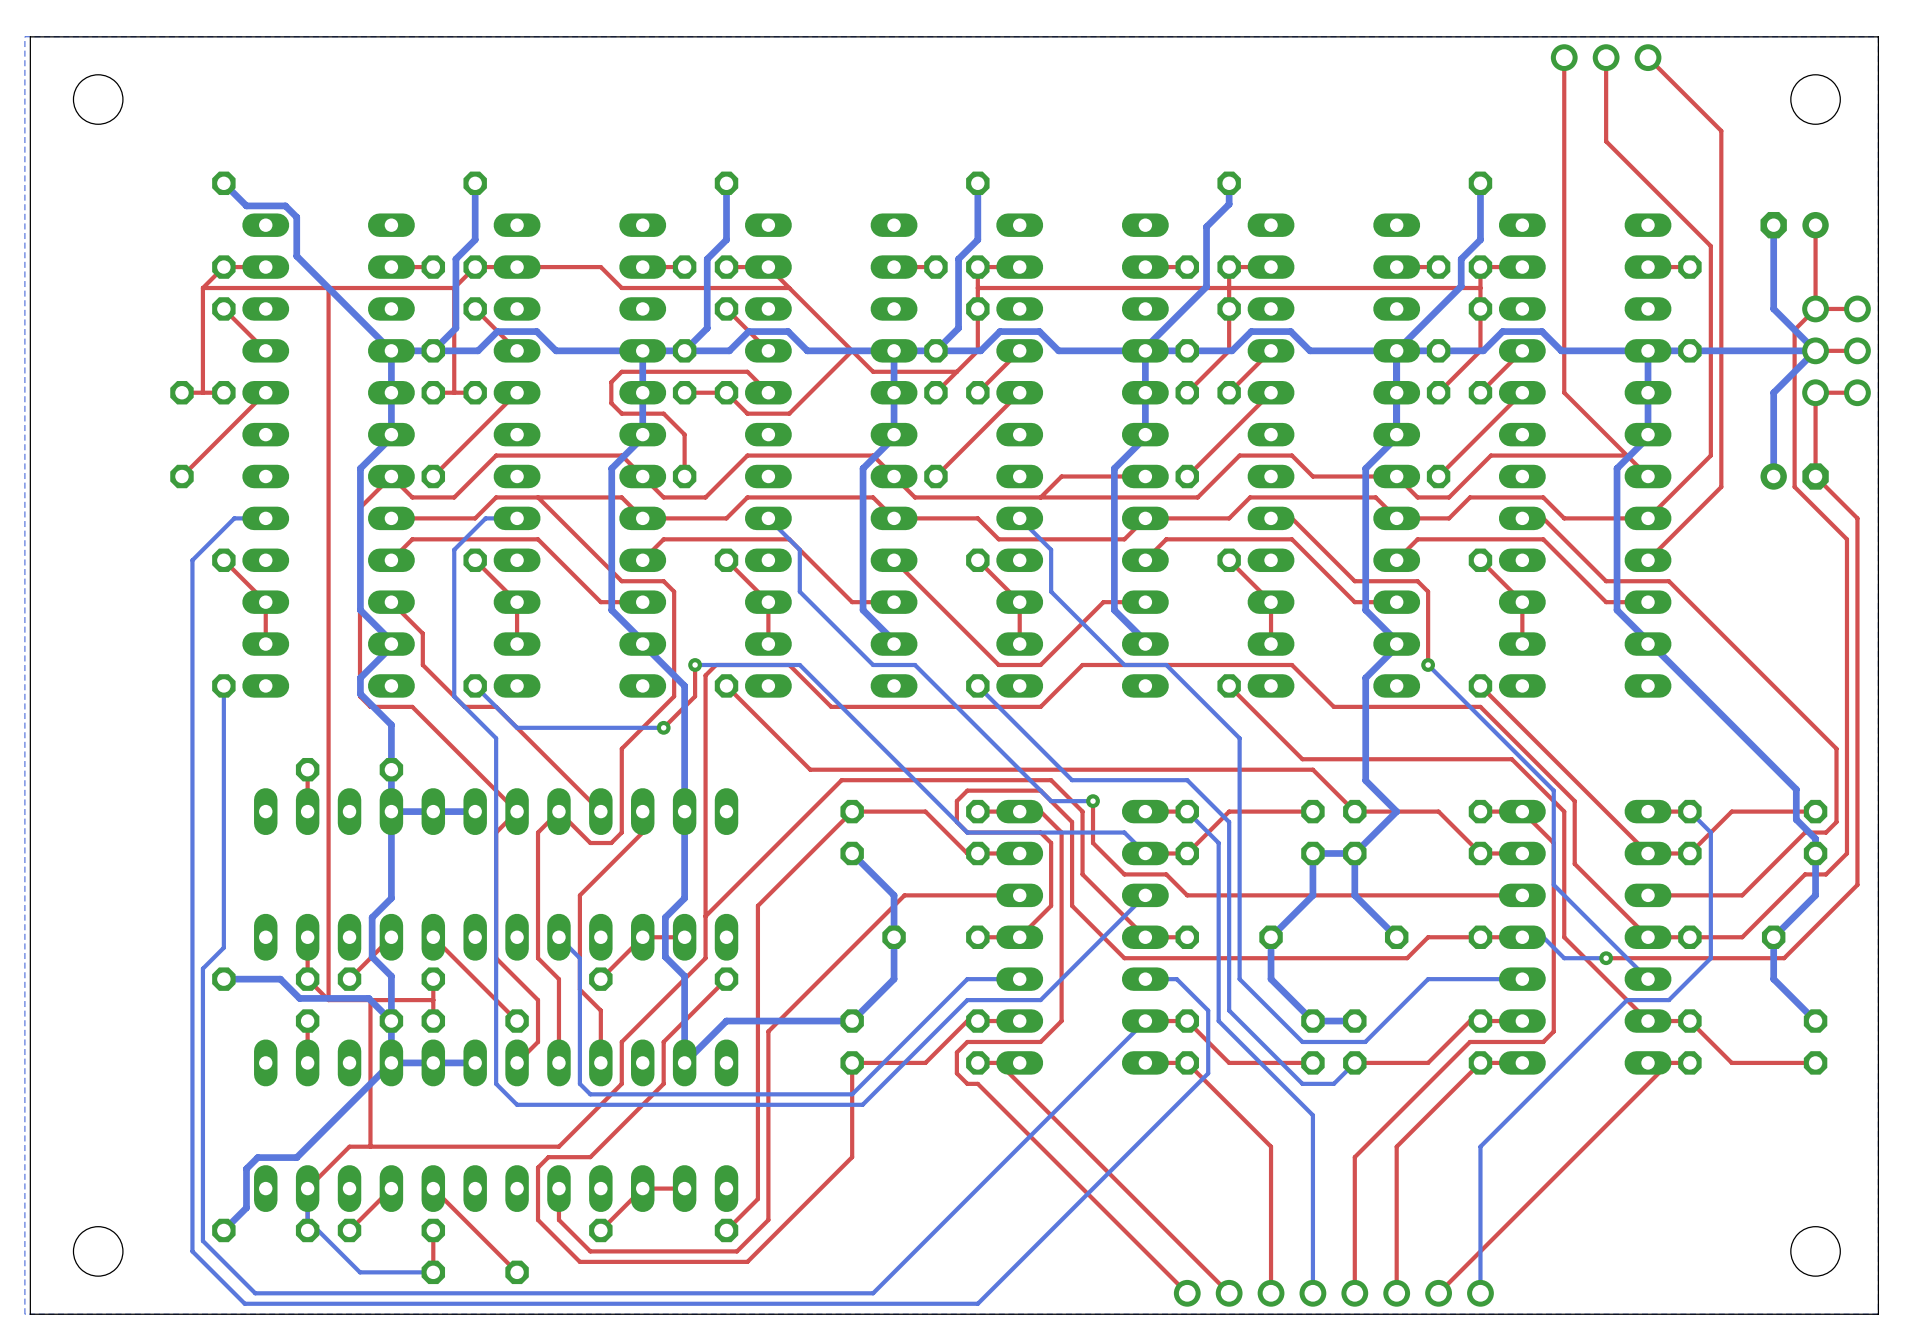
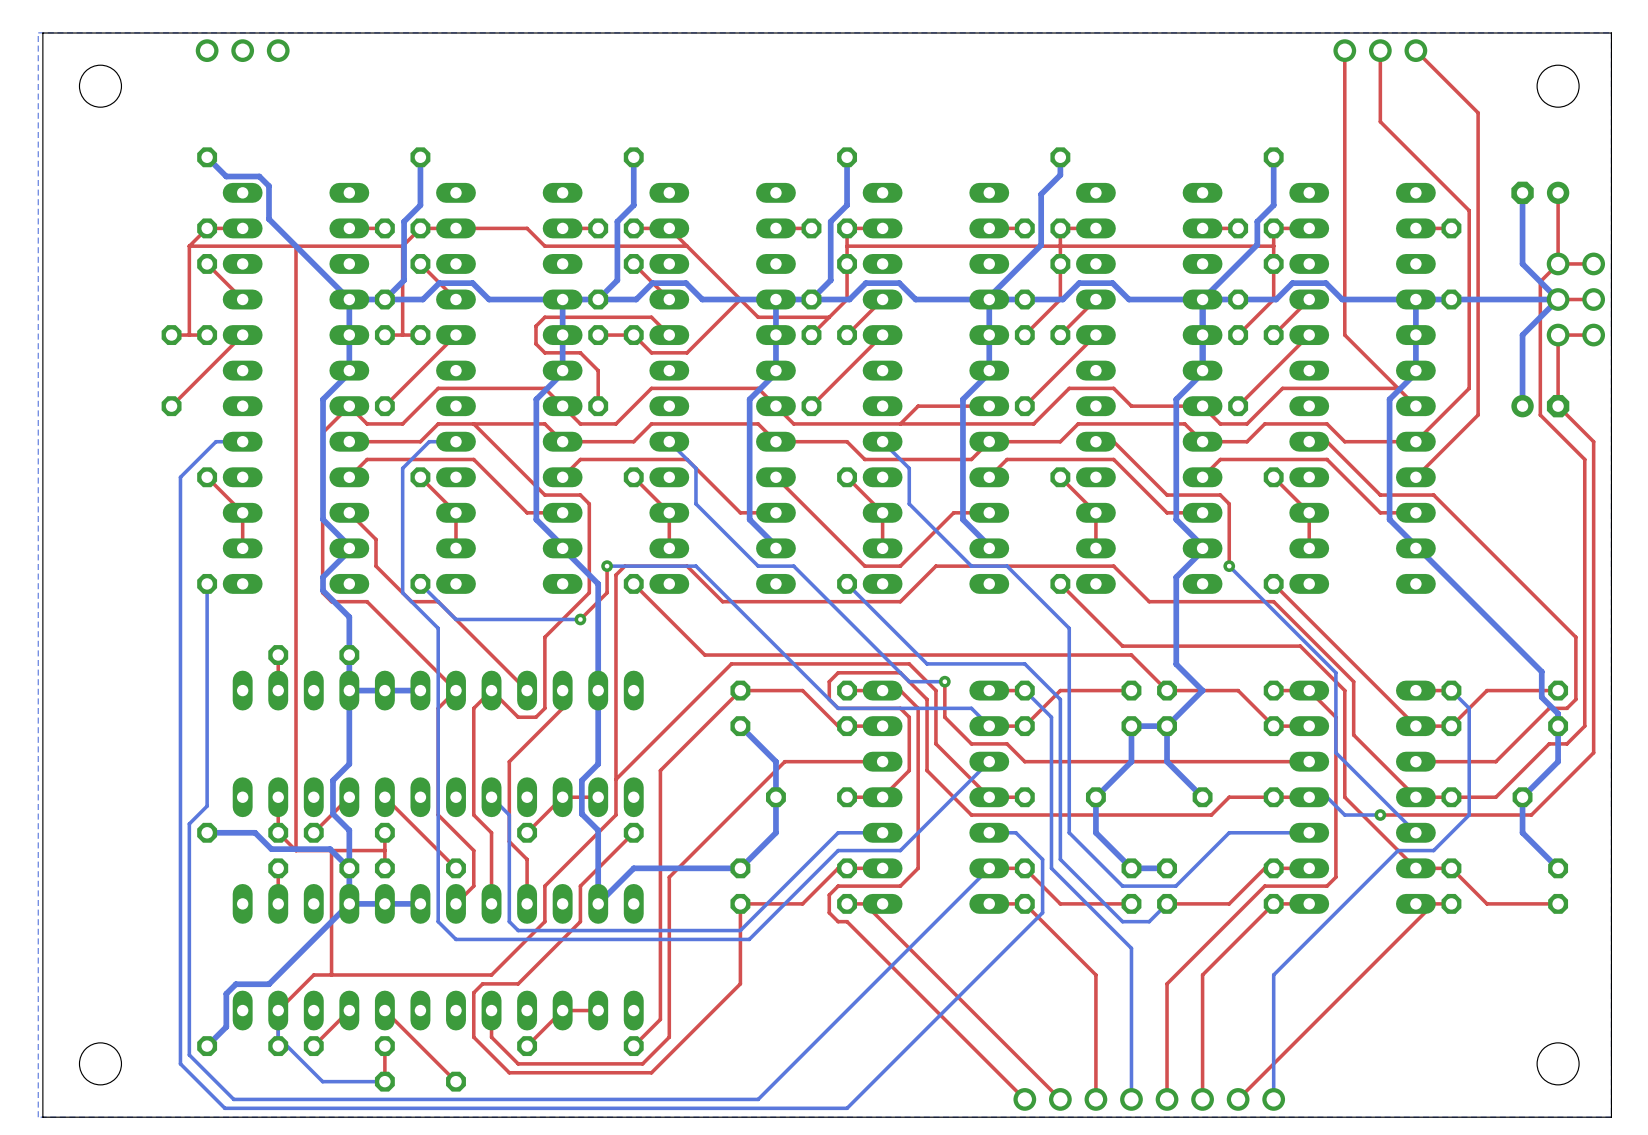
part: none -> (207, 50)
part: none -> (242, 50)
part: none -> (278, 50)

